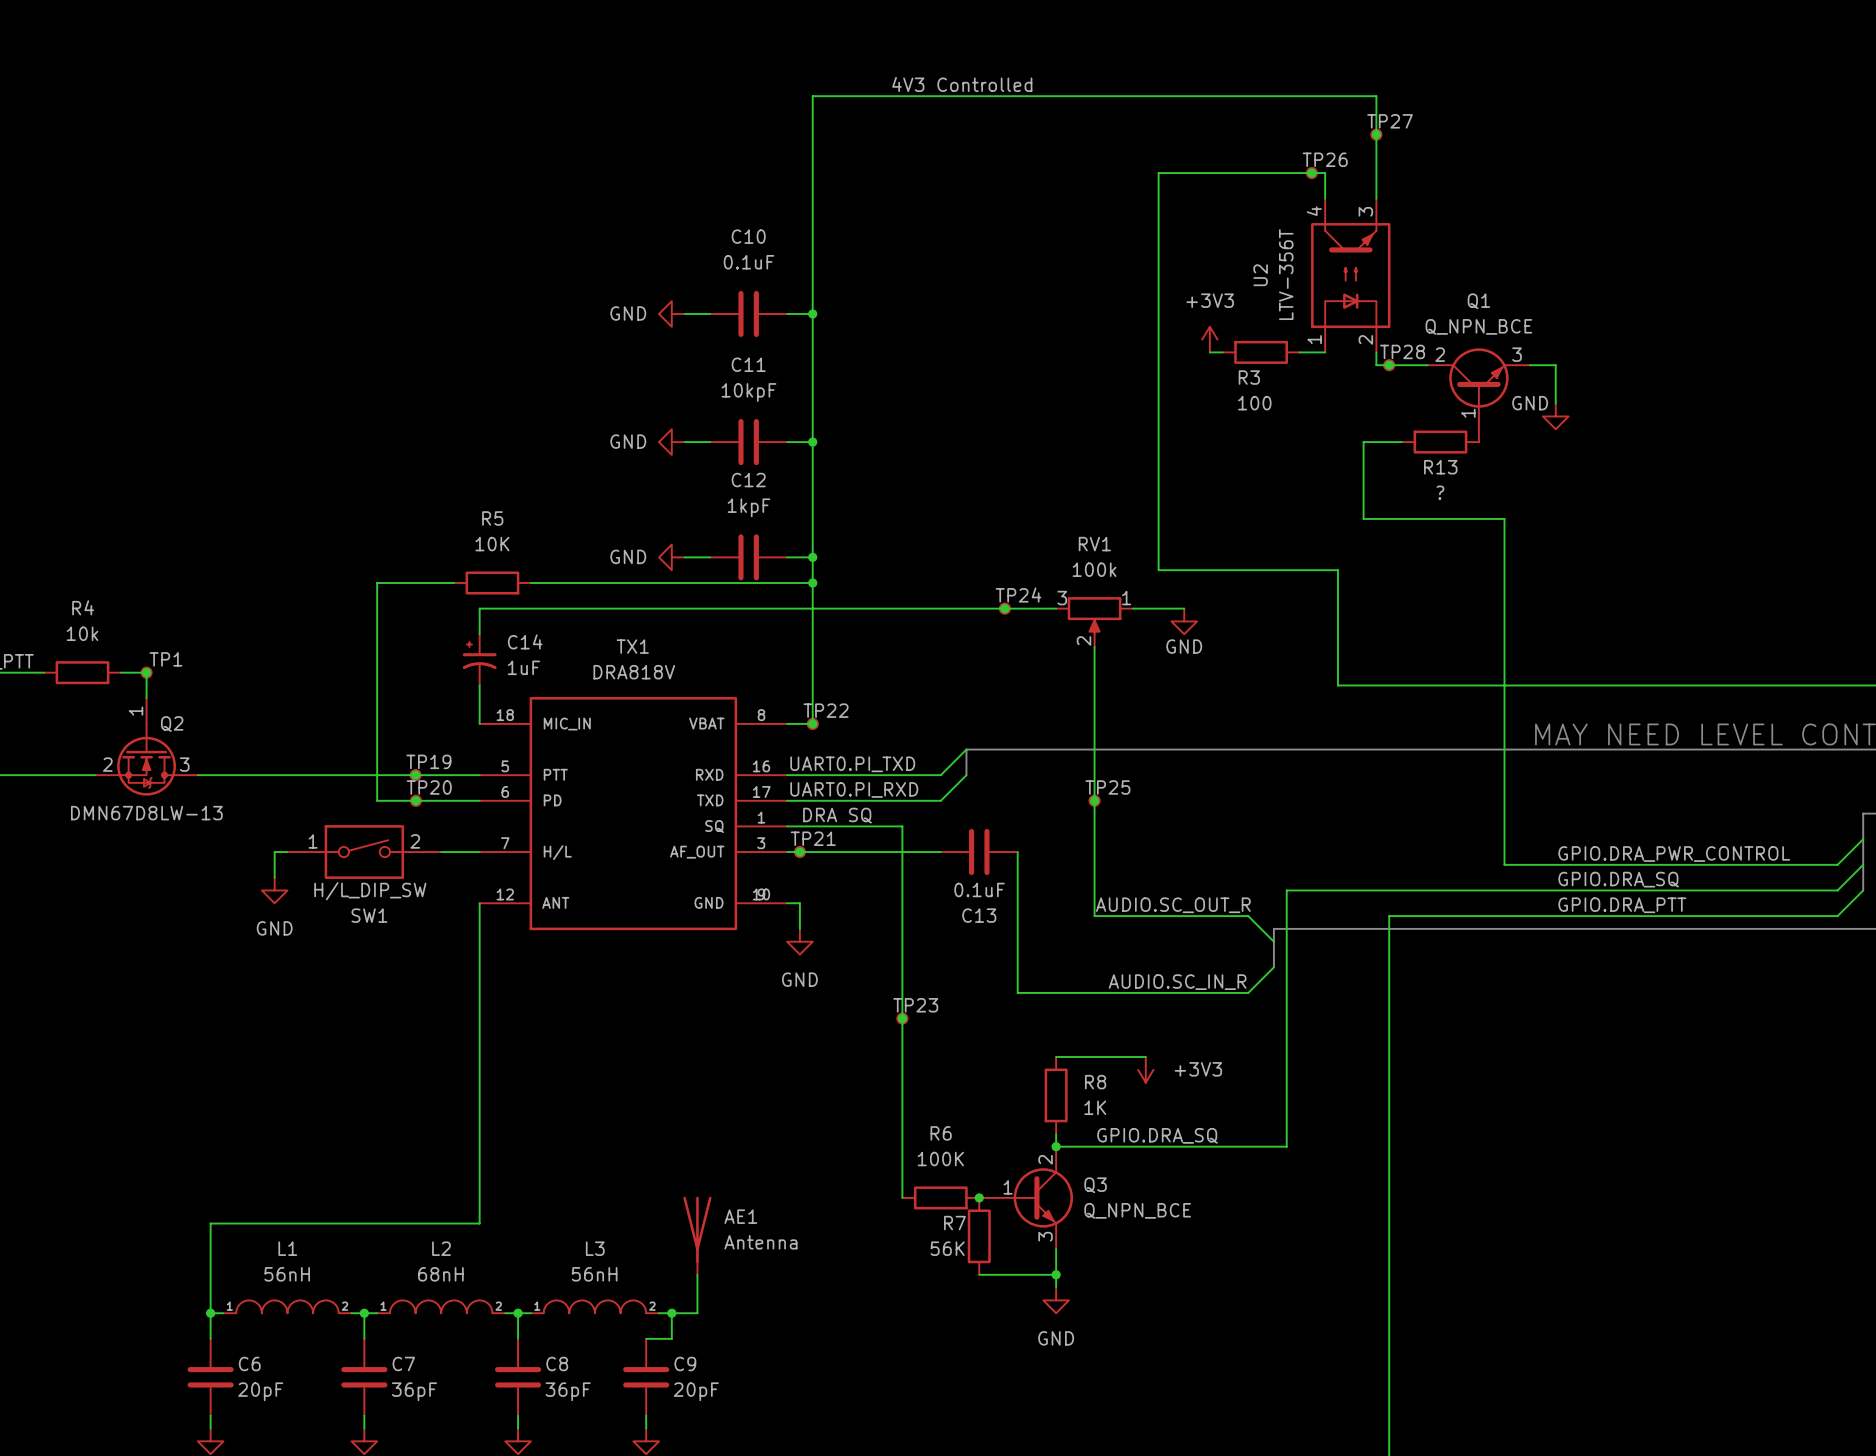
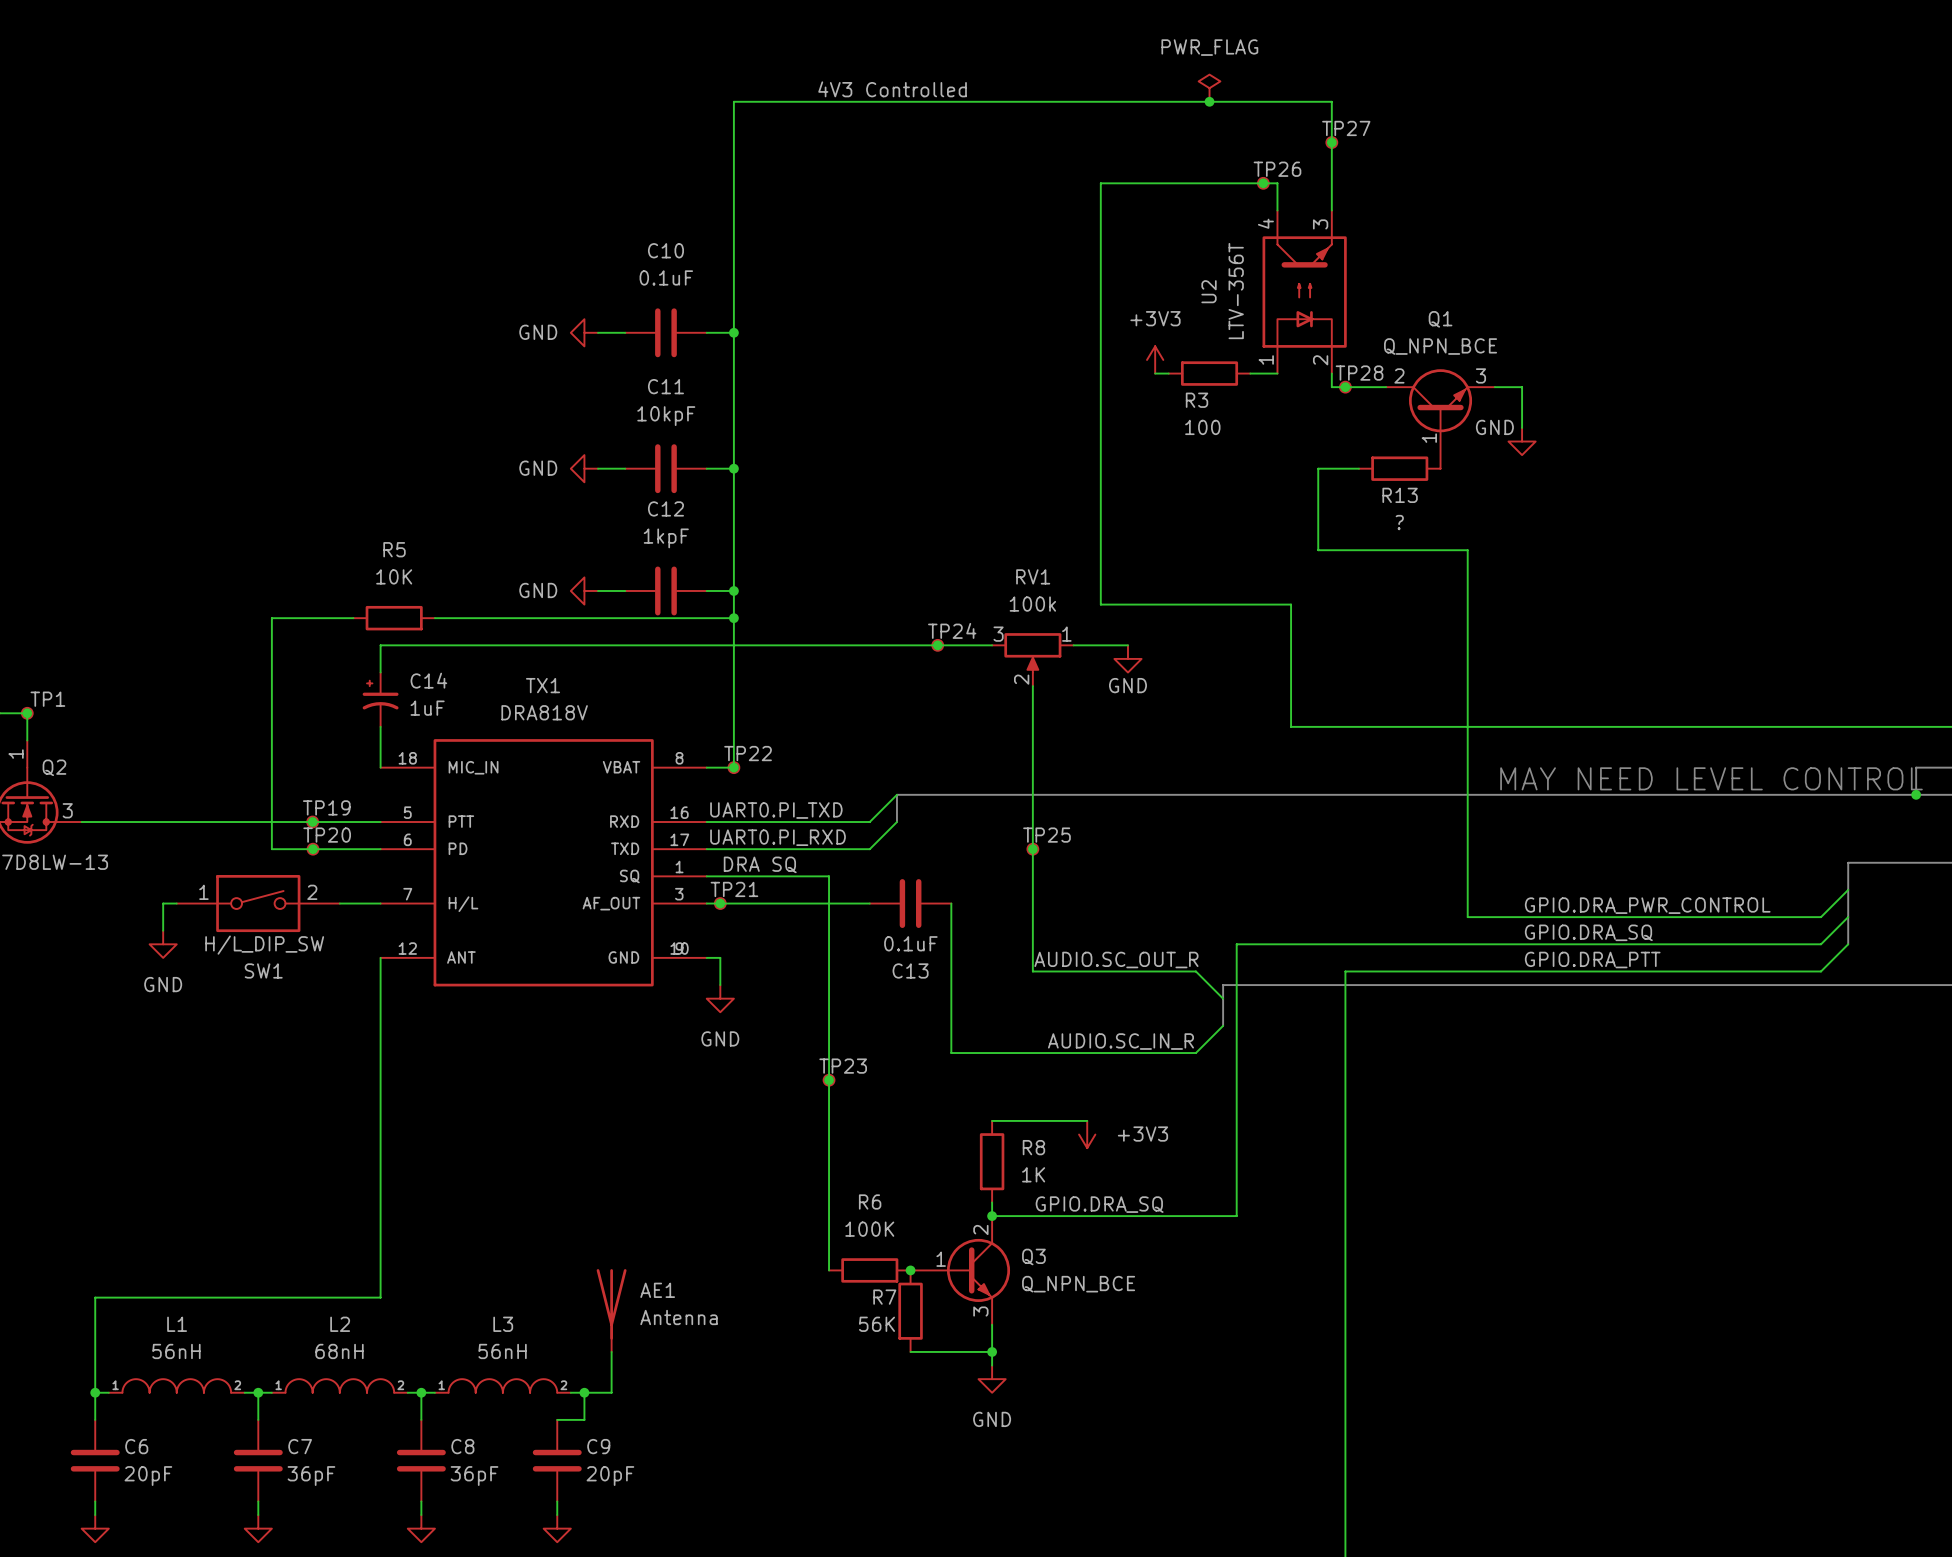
power symbol: none -> PWR_FLAG (1209, 88)
junction: none -> (1209, 101)

